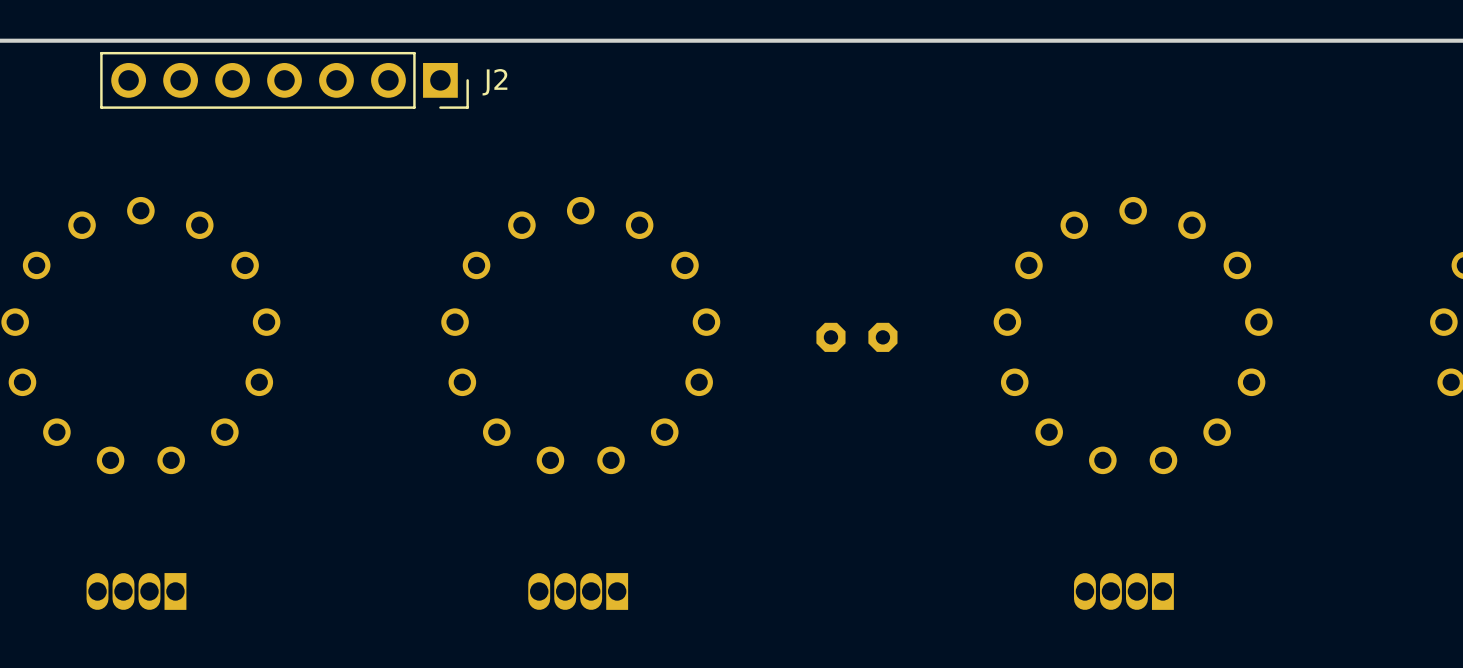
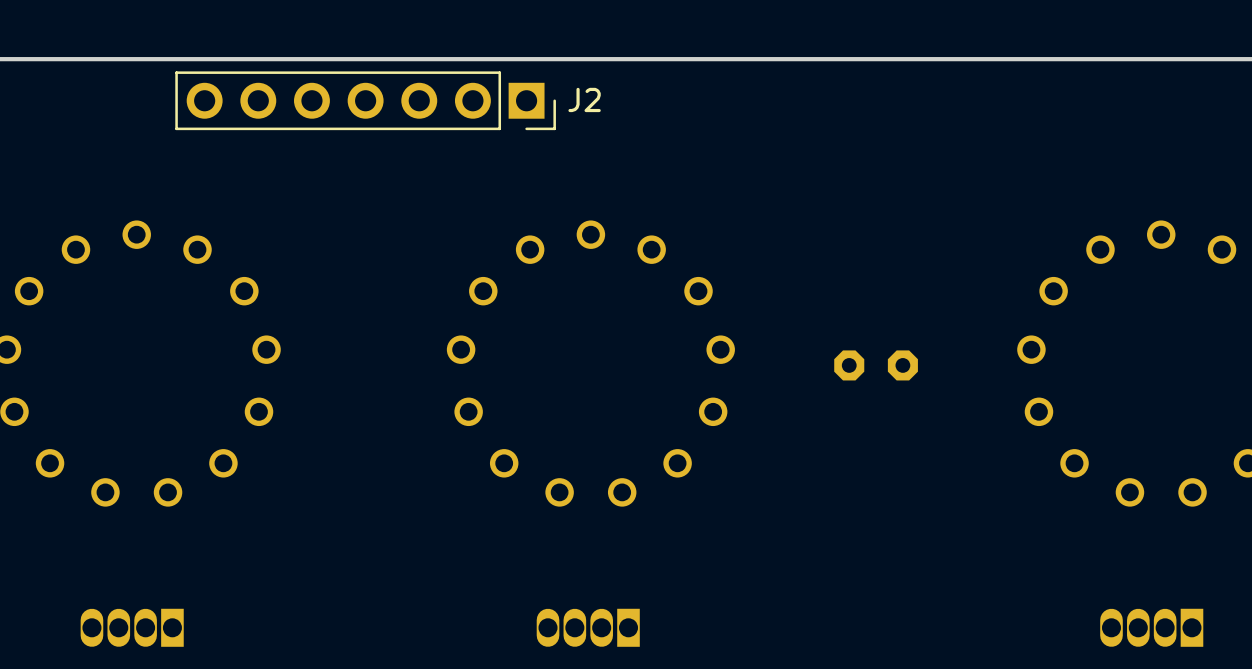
J2 position: (284, 80) -> (365, 100)

